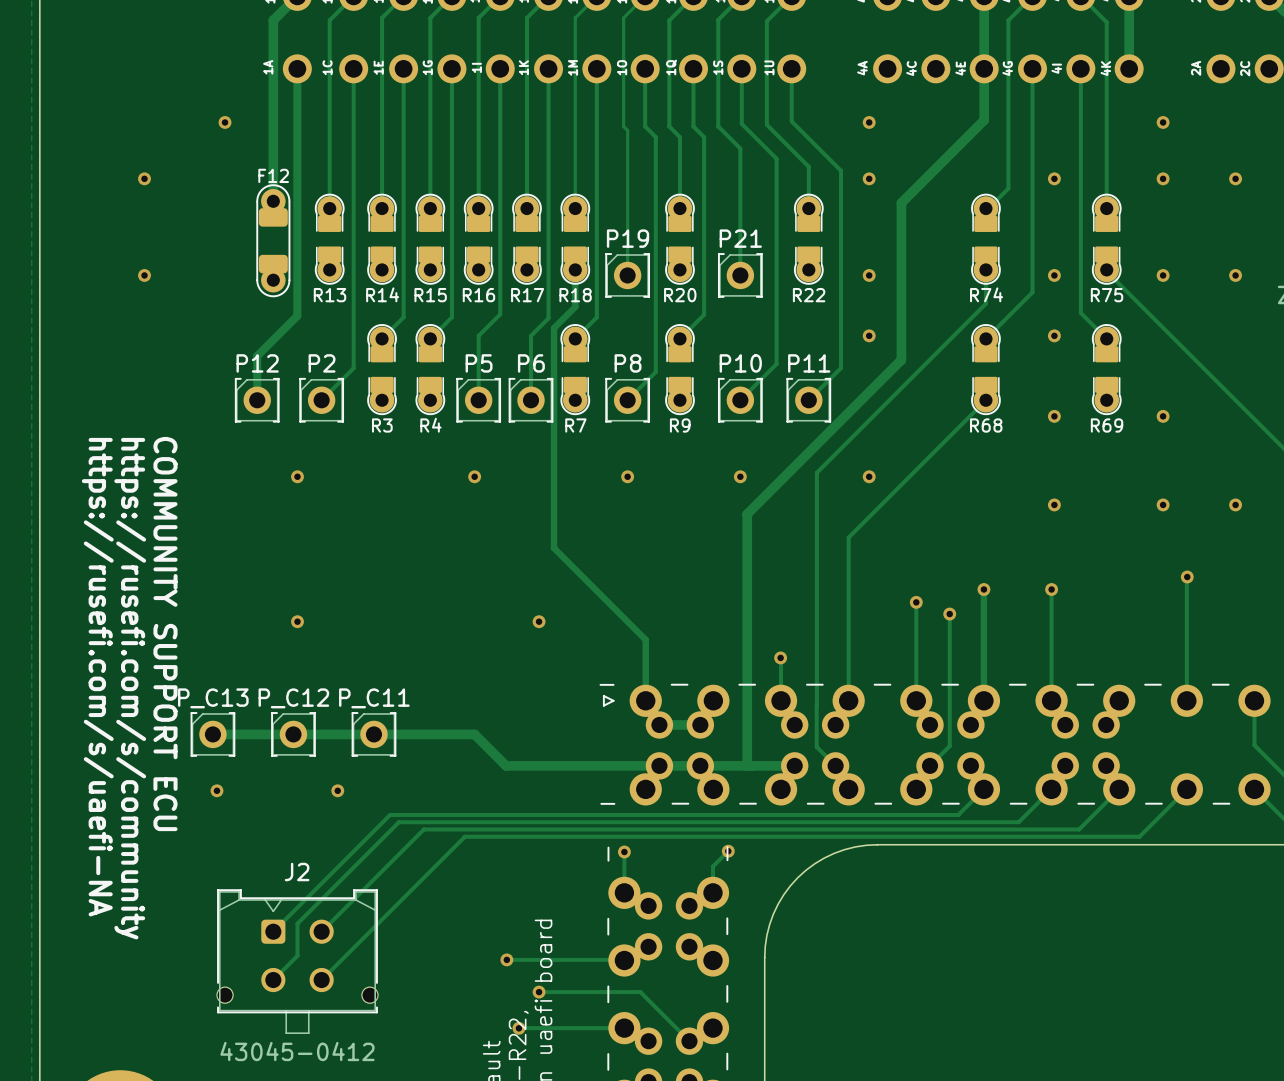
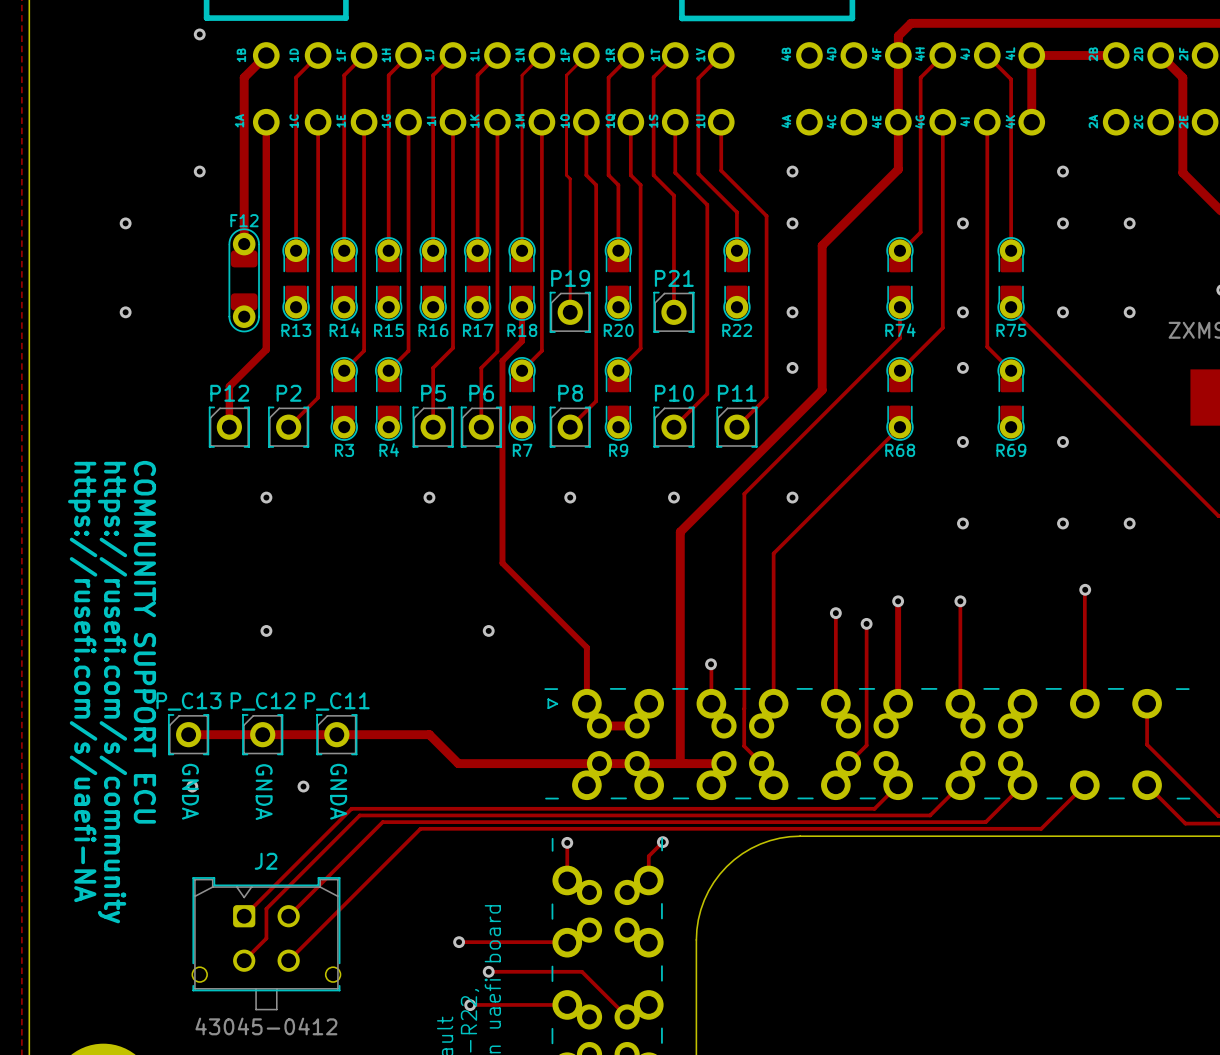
text: none -> GNDA (190, 791)
text: none -> GNDA (264, 792)
text: none -> GNDA (338, 791)

